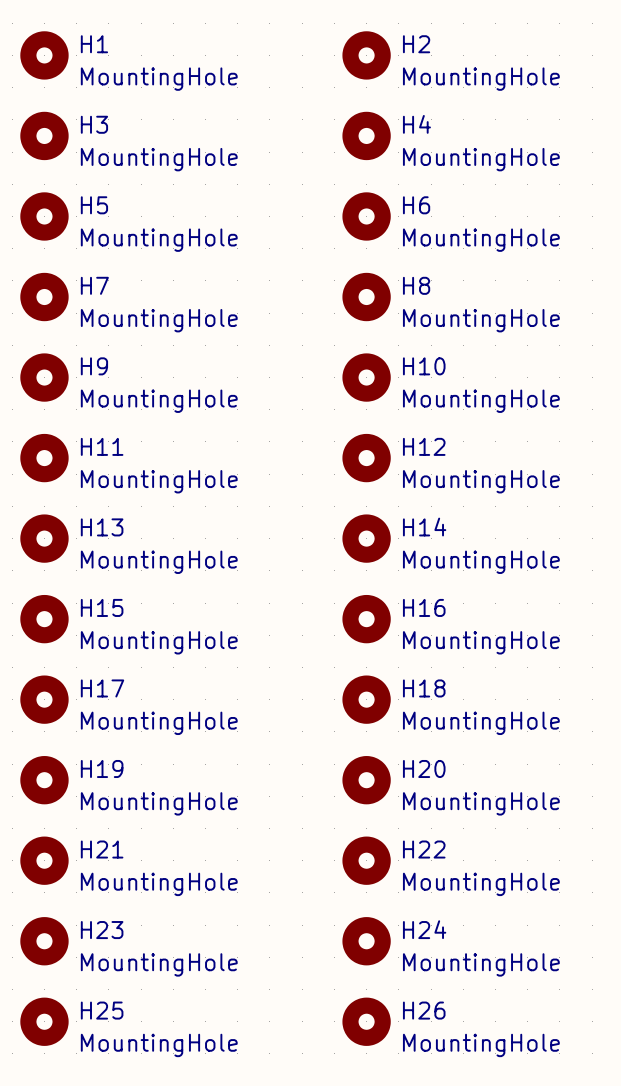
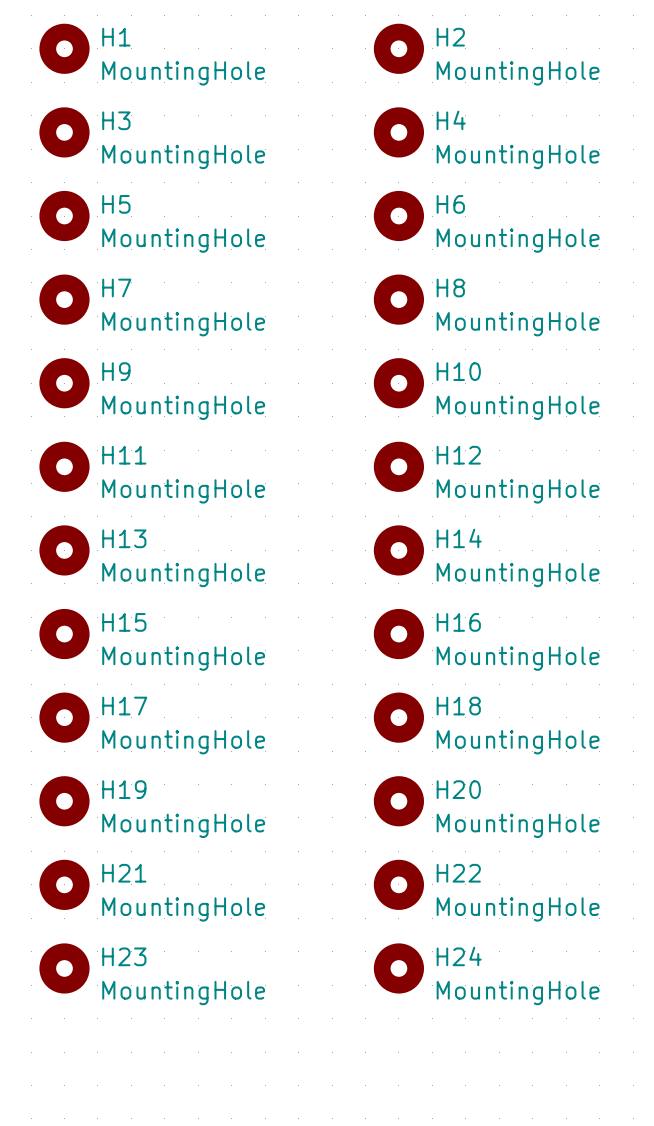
H25: MountingHole (44, 1021) -> none
H26: MountingHole (366, 1021) -> none

